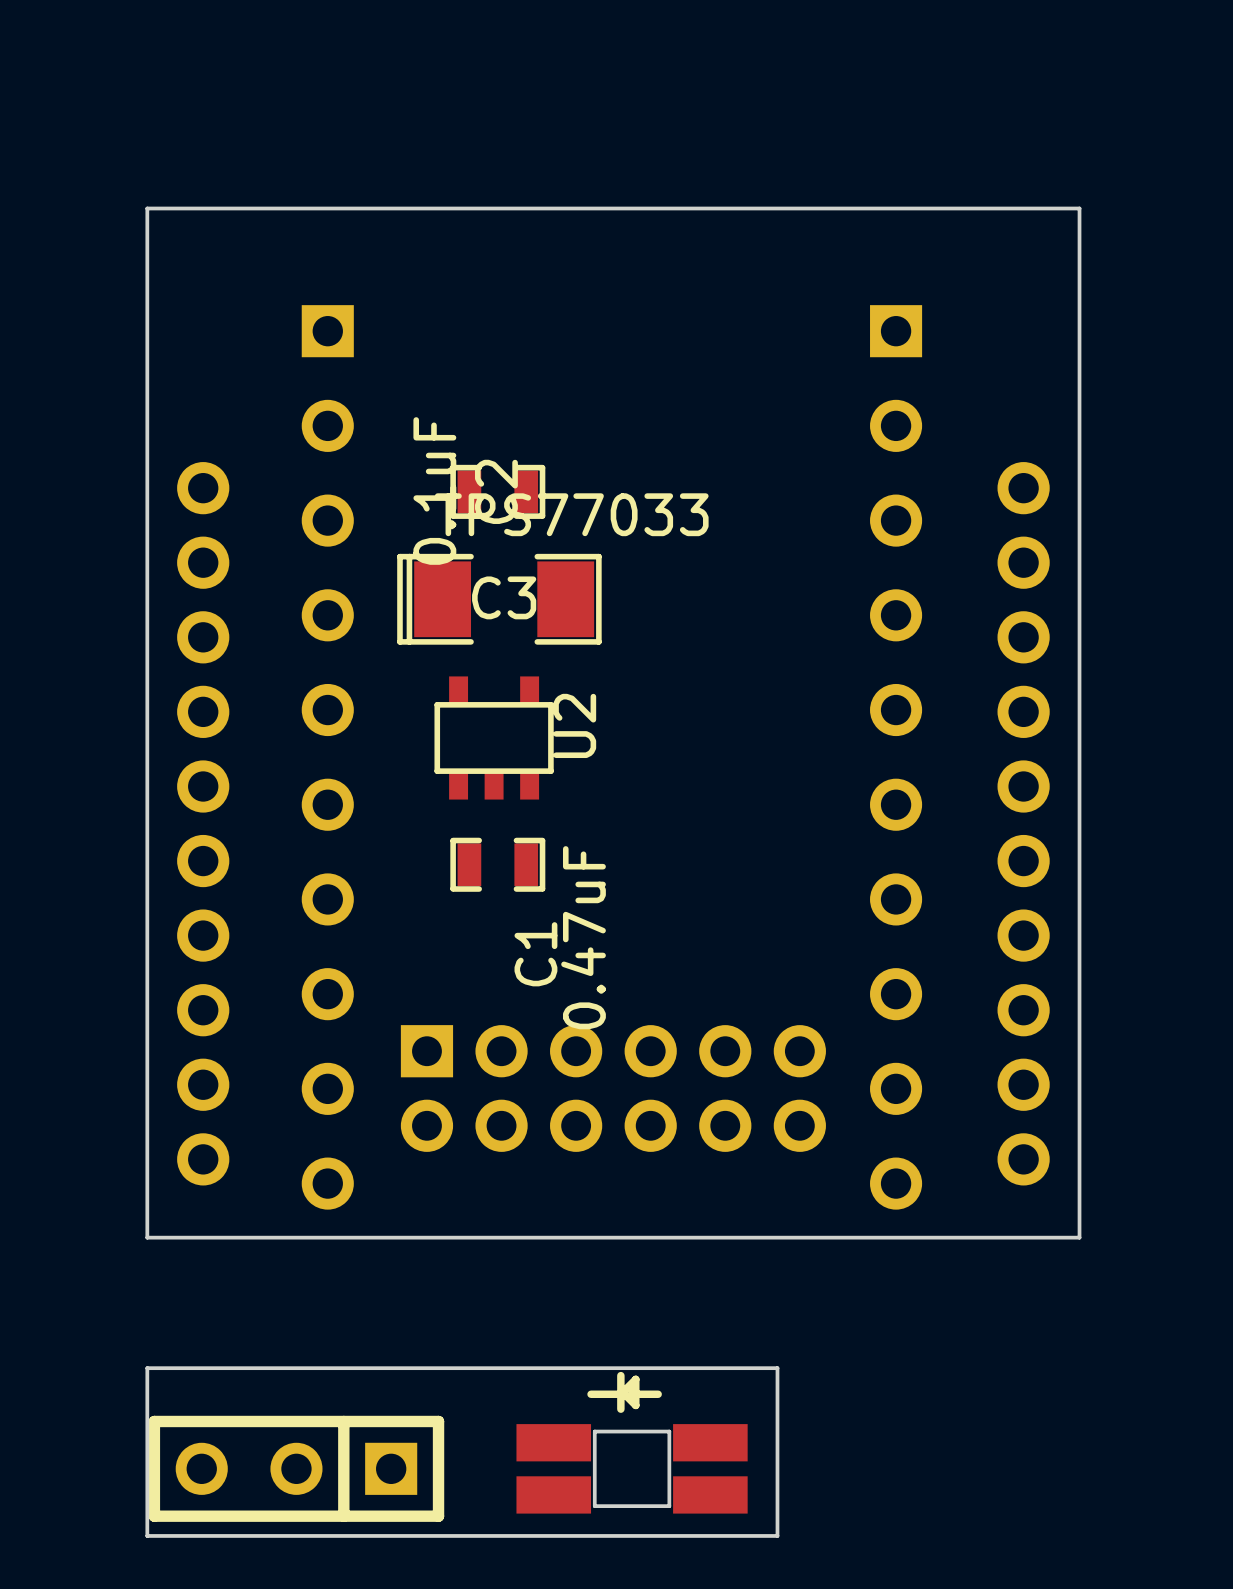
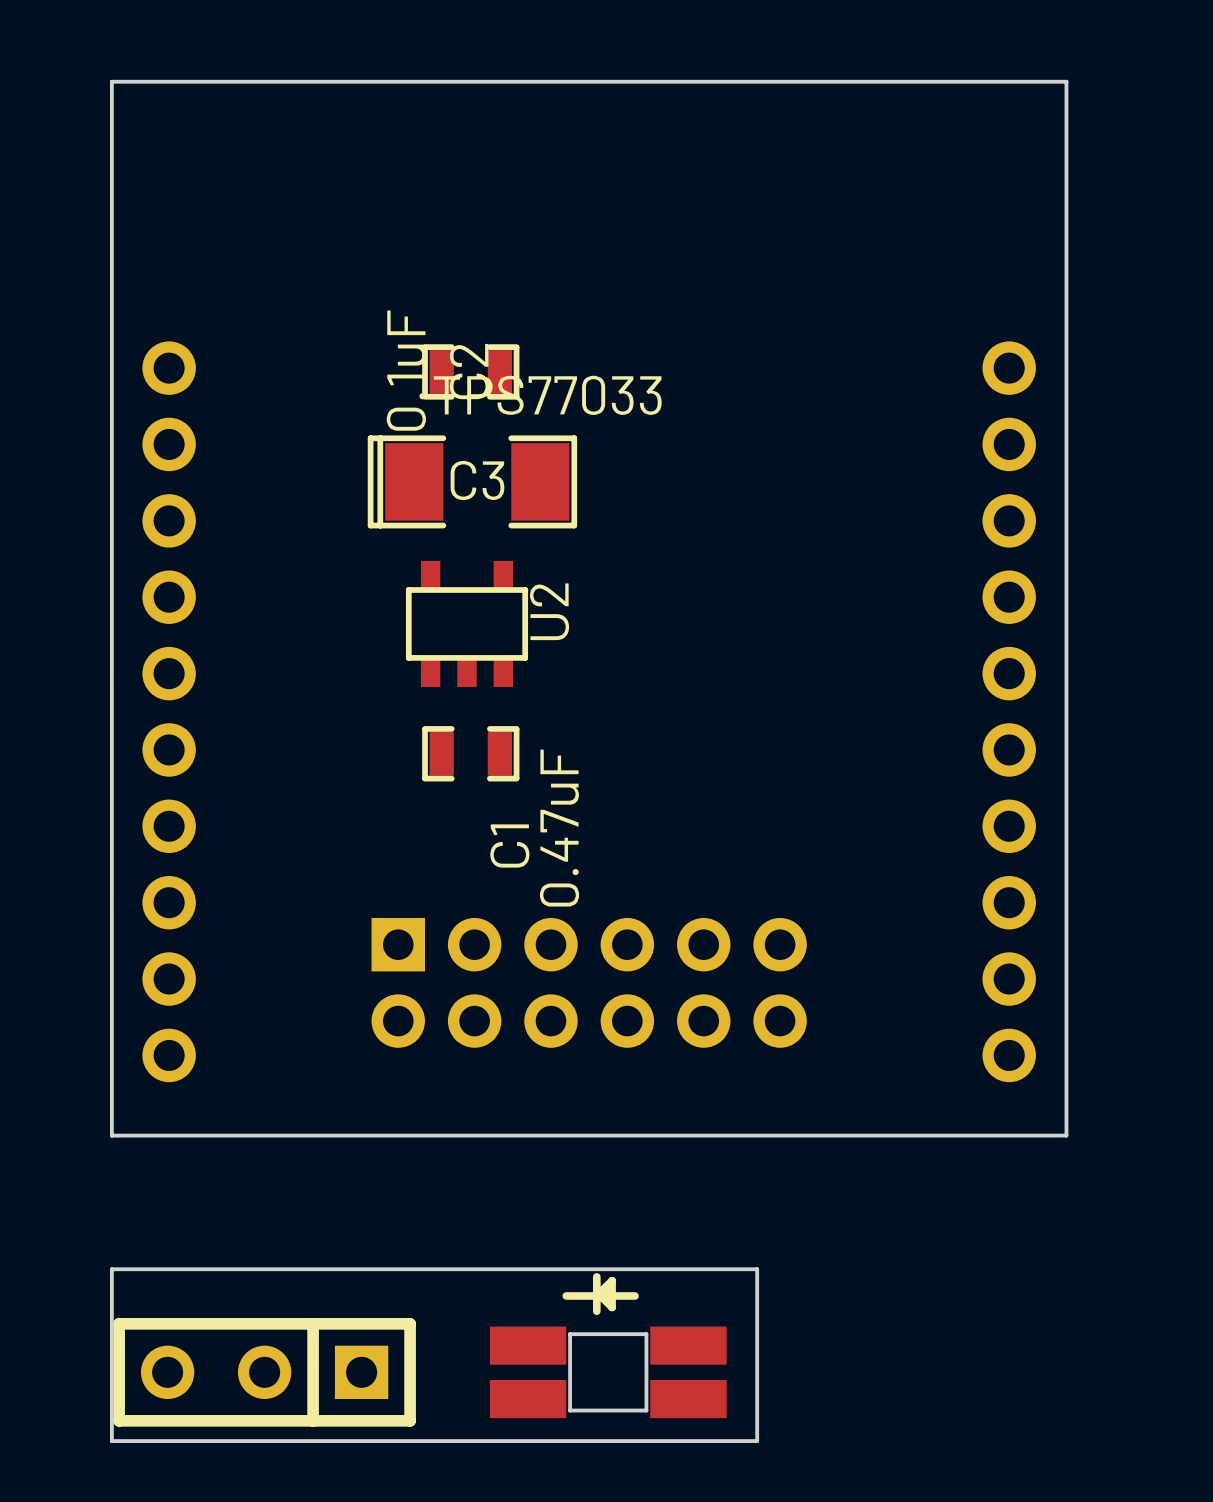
part: (327, 757) -> none
part: (896, 757) -> none

